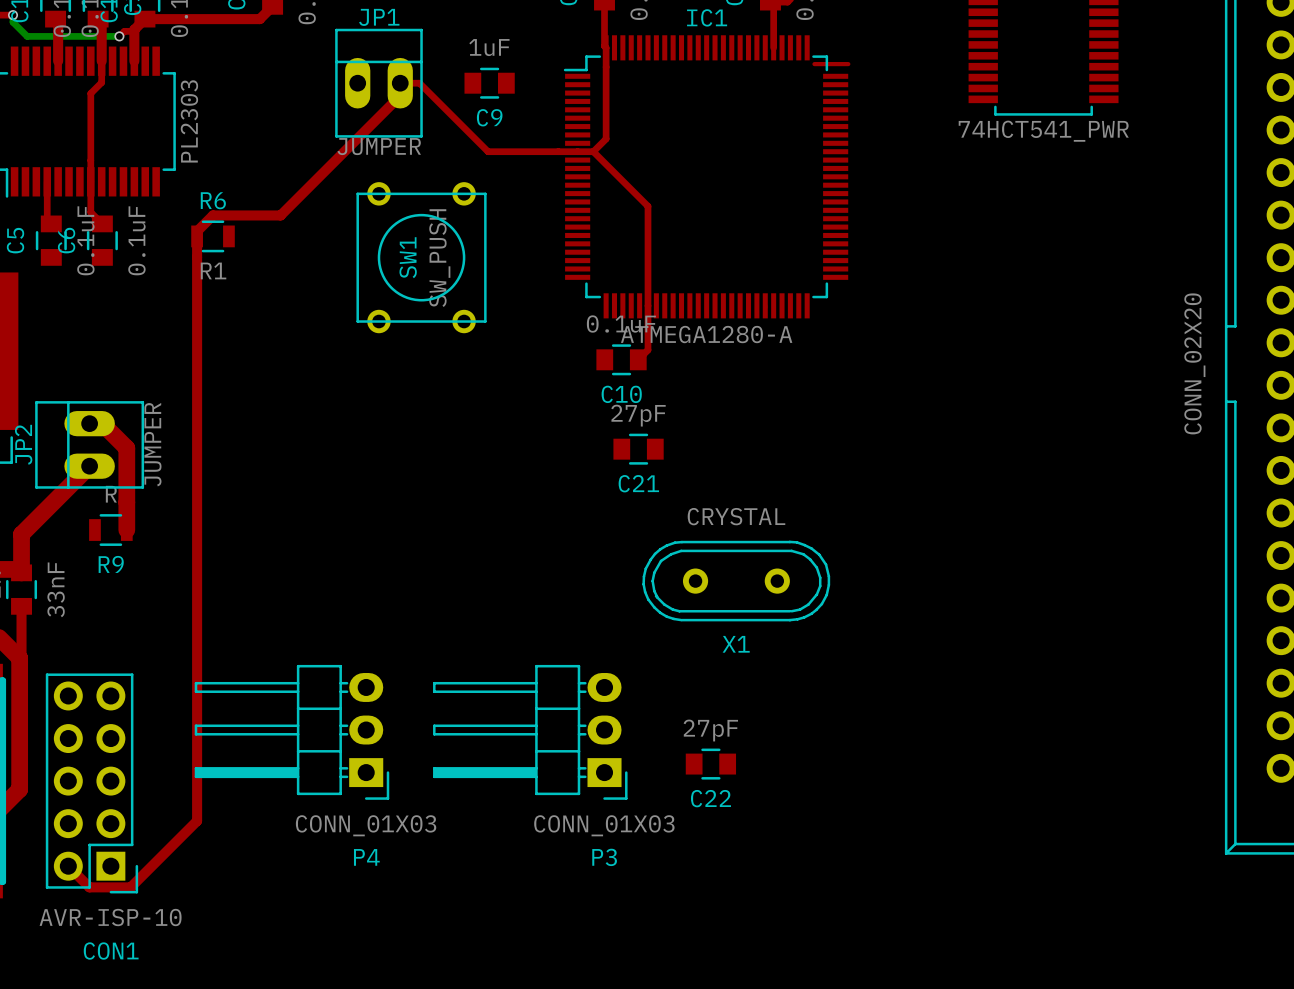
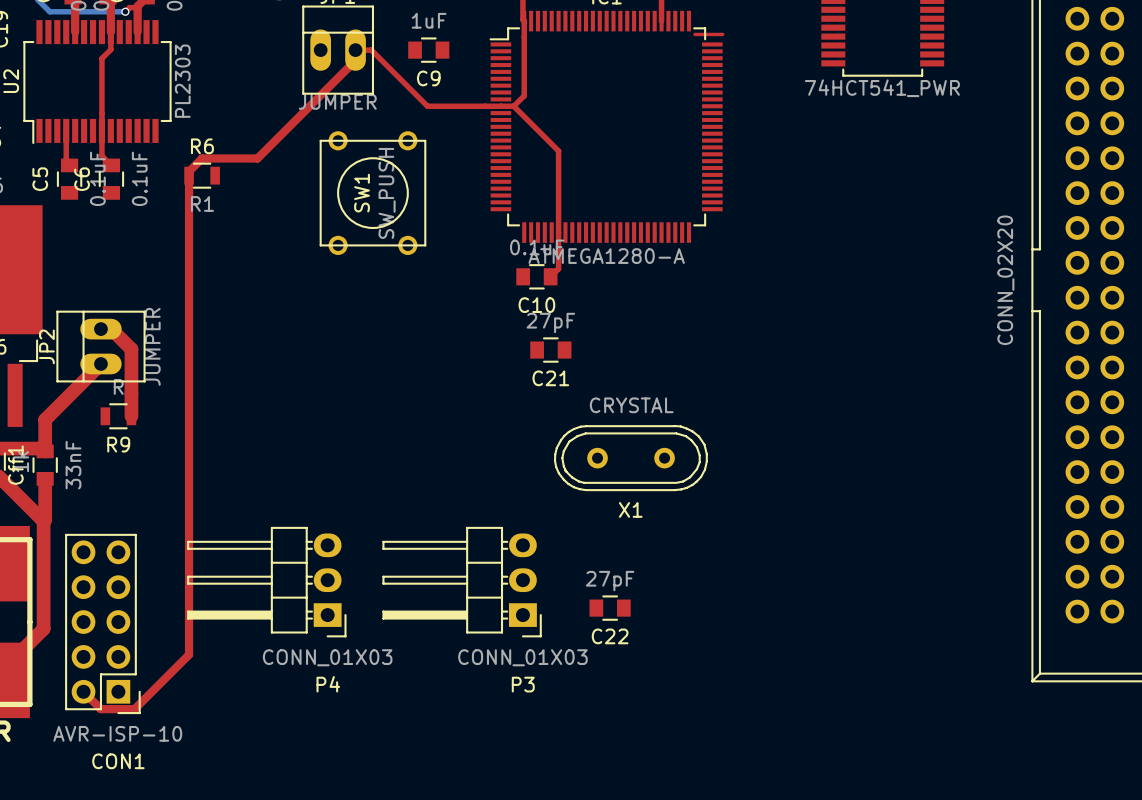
top track width: thin (21, 606) (21, 656) (19, 658) -> thick (45, 478) (43, 521)

